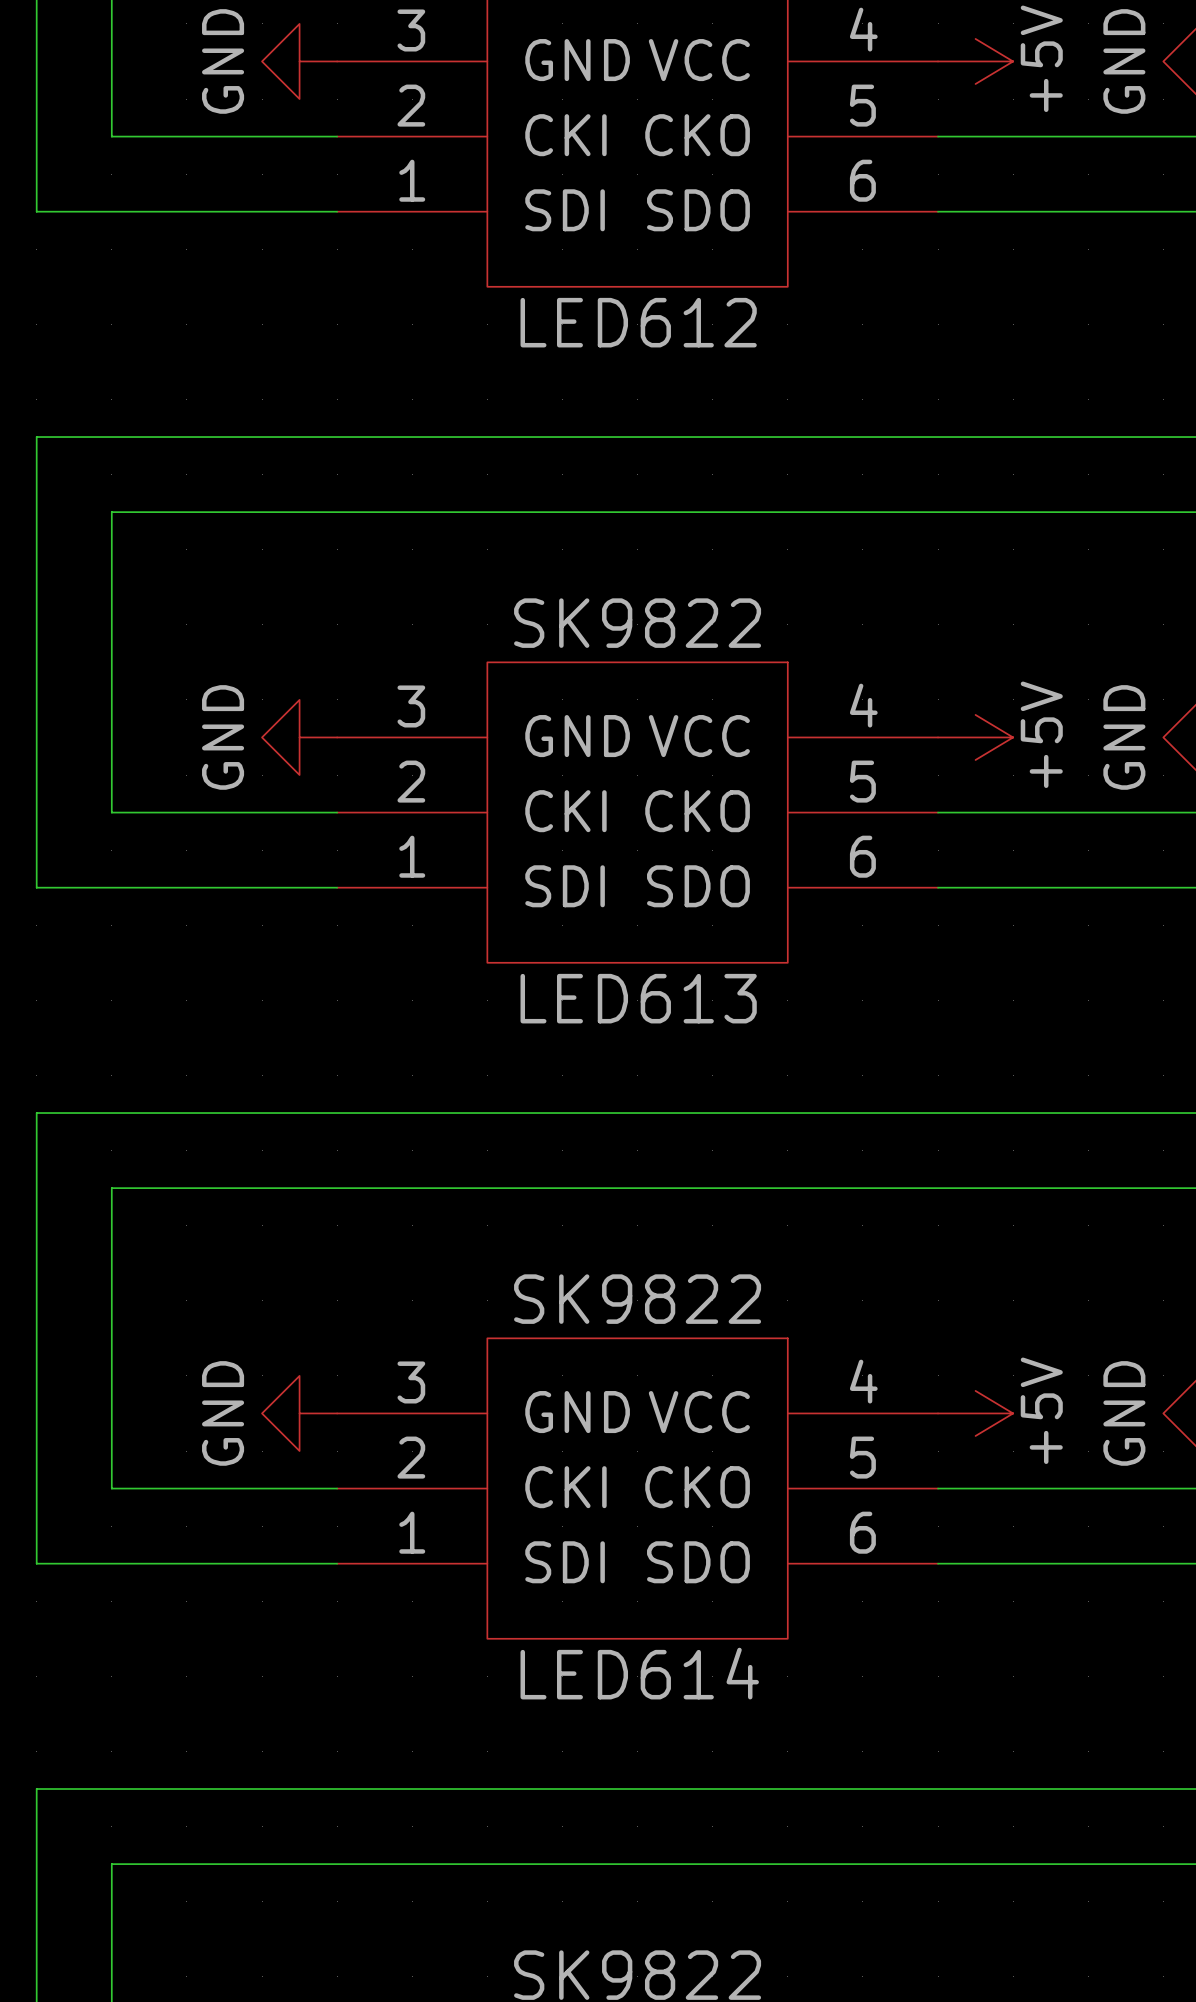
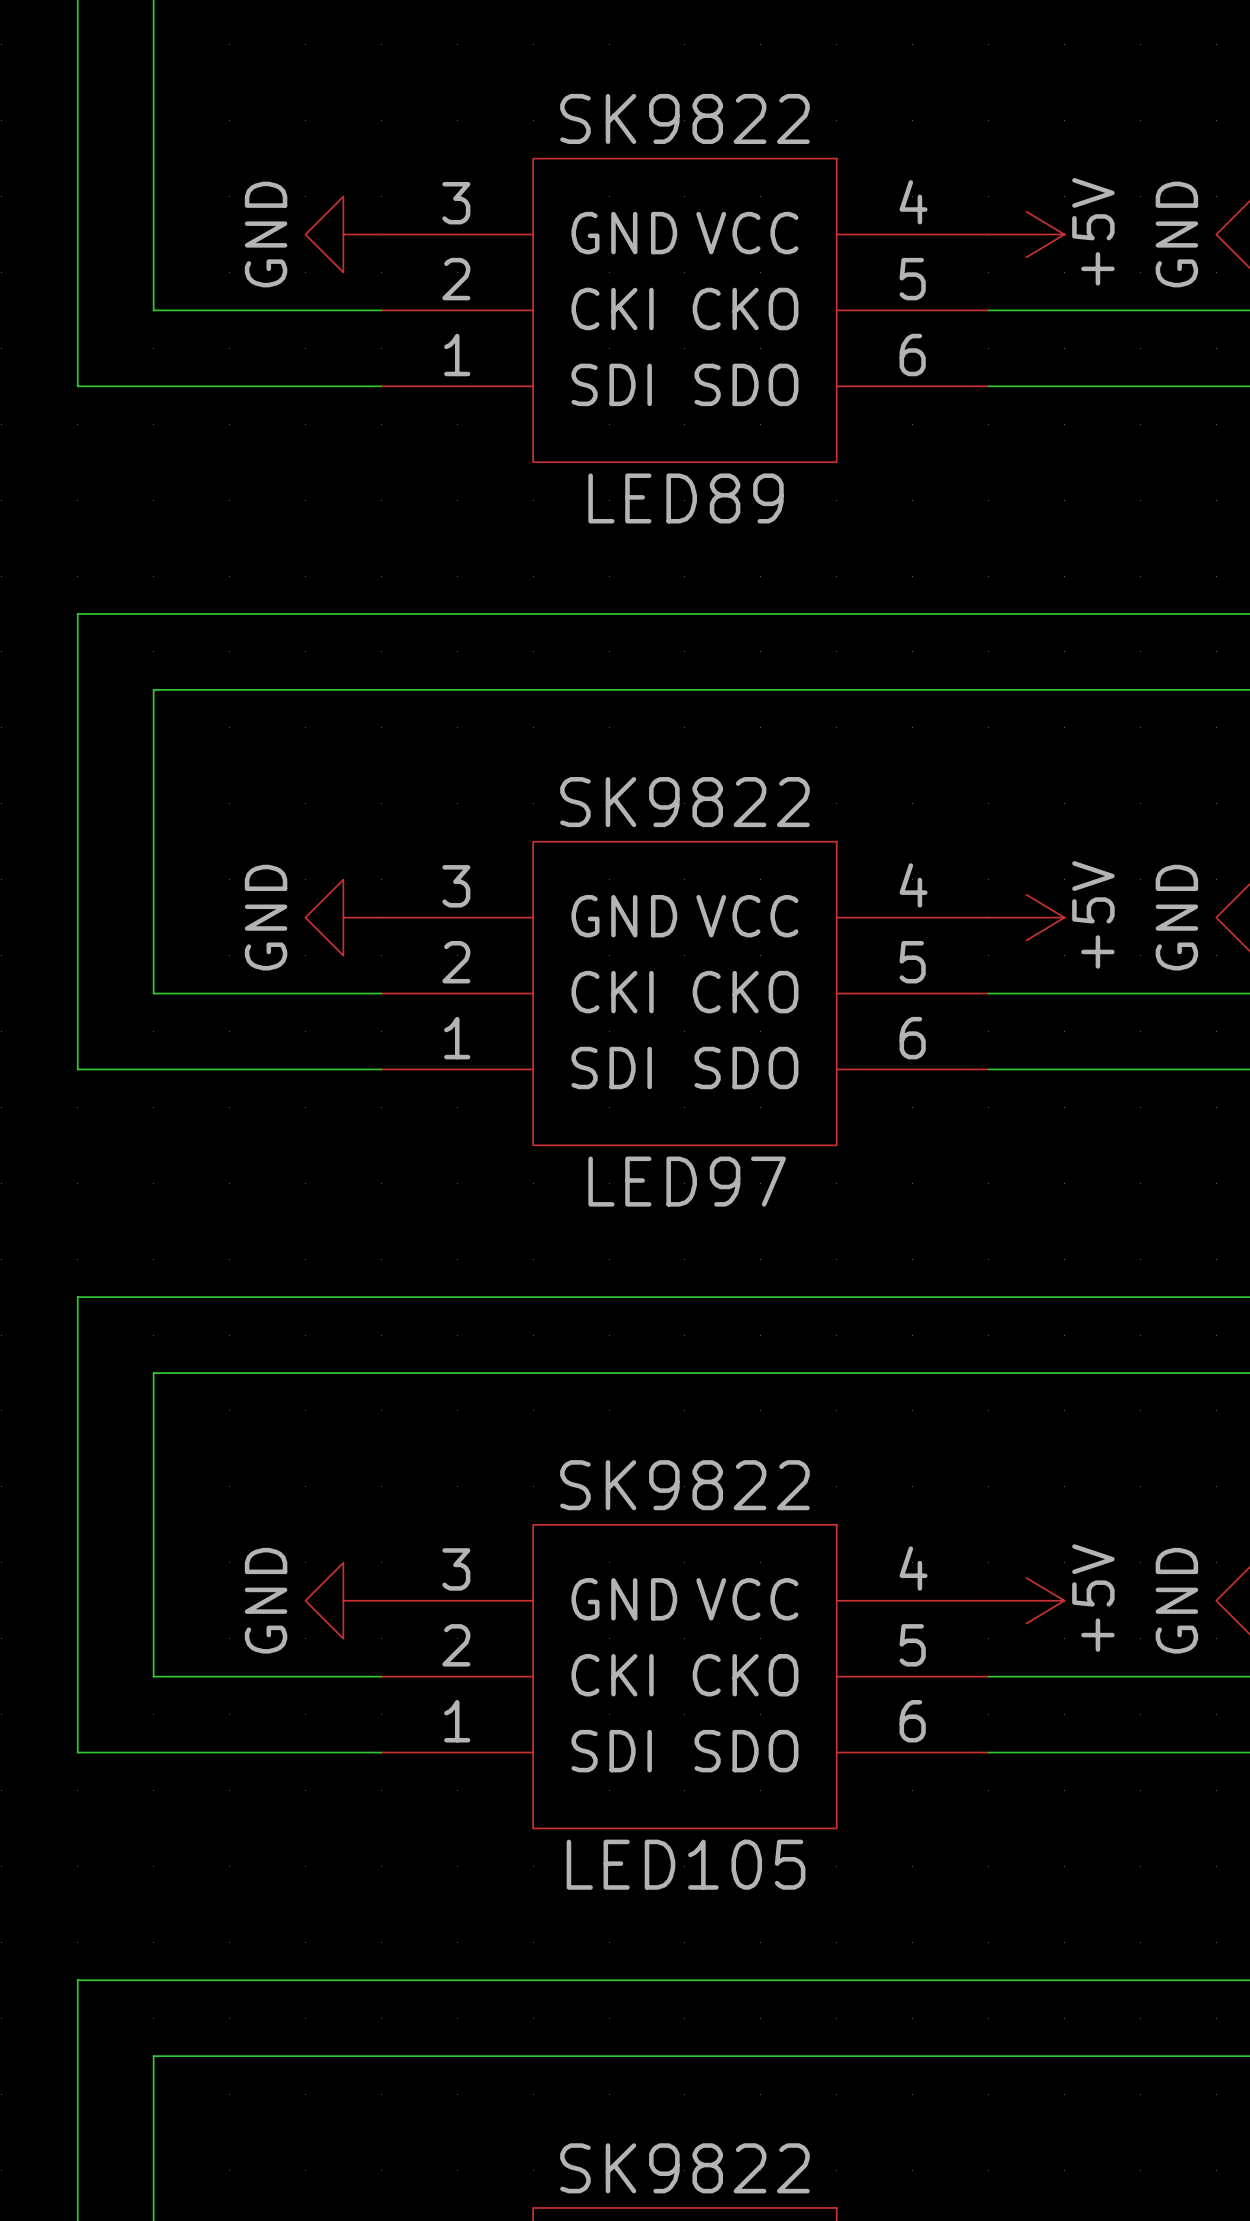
LED612 name: LED612 (638, 322) -> LED89 (686, 498)
LED613 name: LED613 (638, 998) -> LED97 (687, 1181)
LED614 name: LED614 (639, 1673) -> LED105 (686, 1864)

